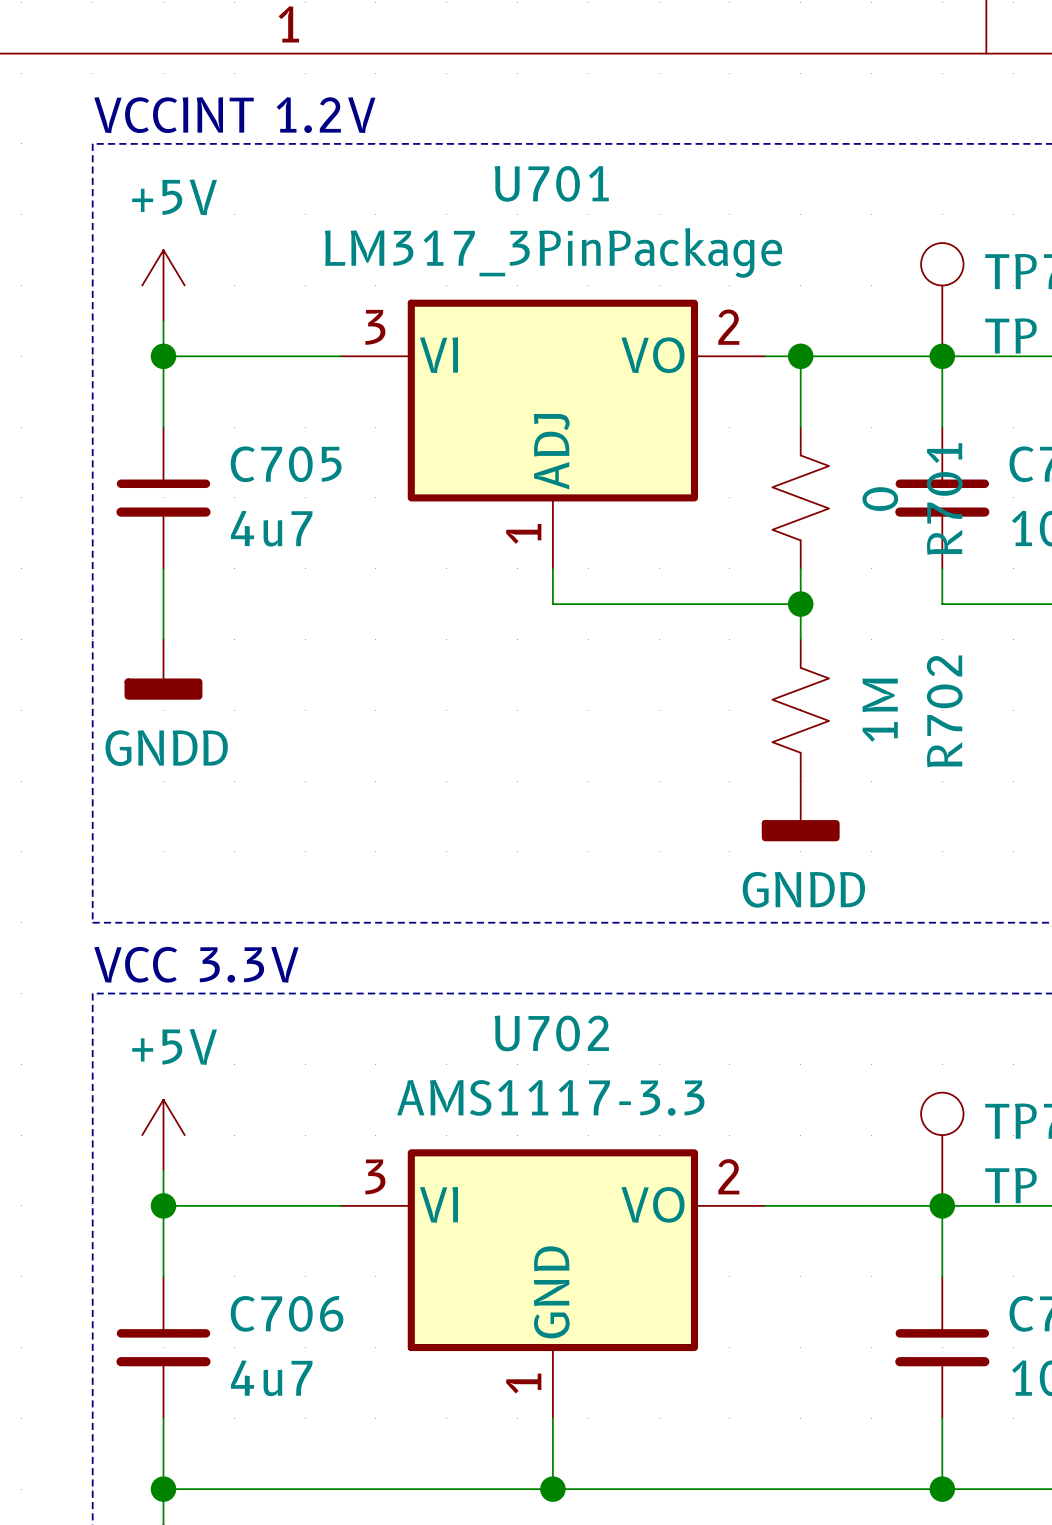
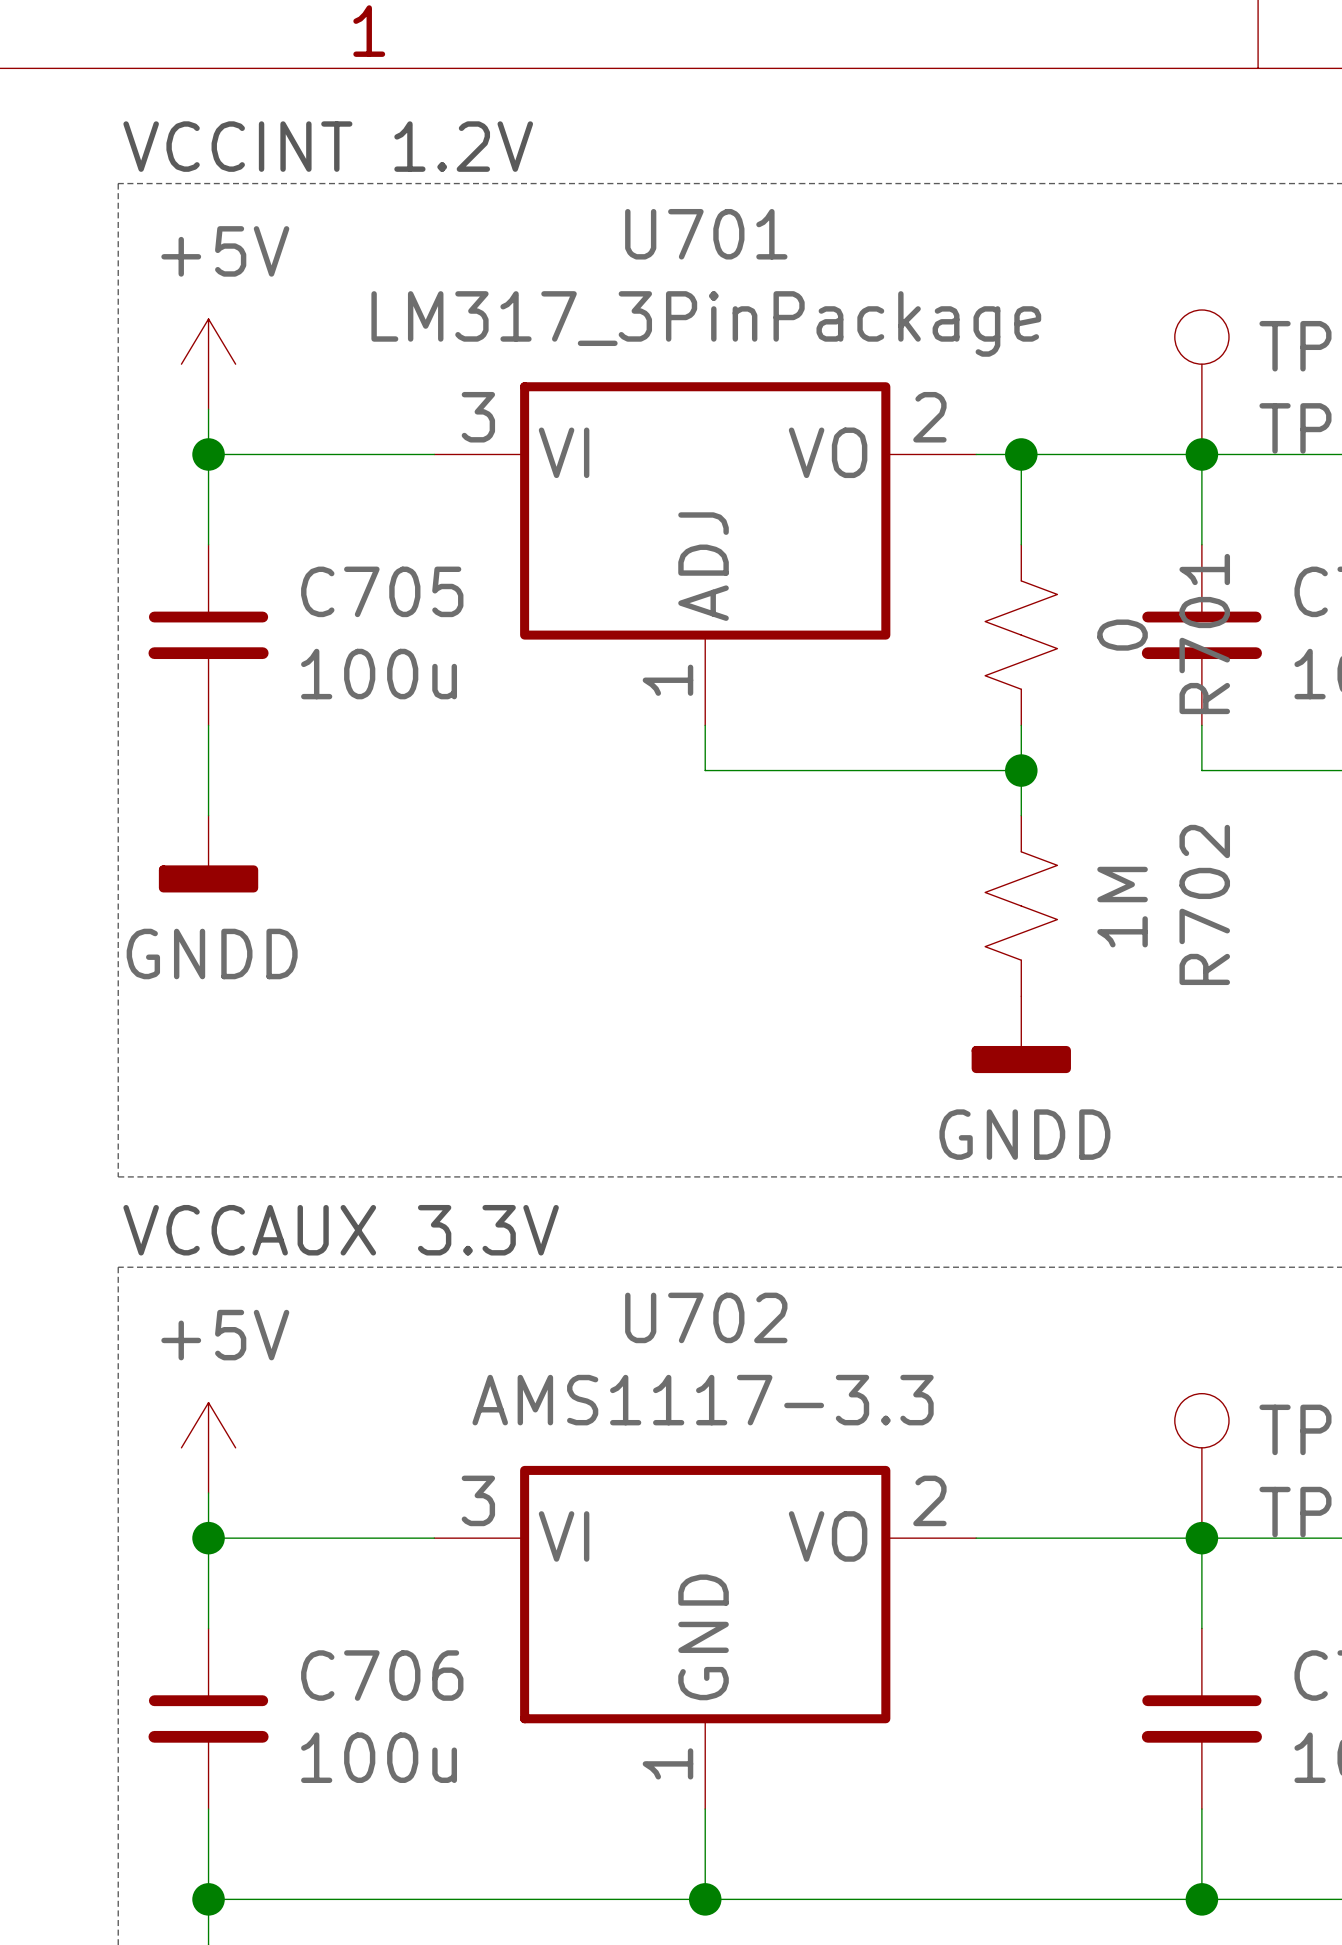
C705 value: 4u7 (271, 528) -> 100u (379, 674)
text: VCC 3.3V (196, 964) -> VCCAUX 3.3V (341, 1230)
C706 value: 4u7 (271, 1378) -> 100u (379, 1757)

